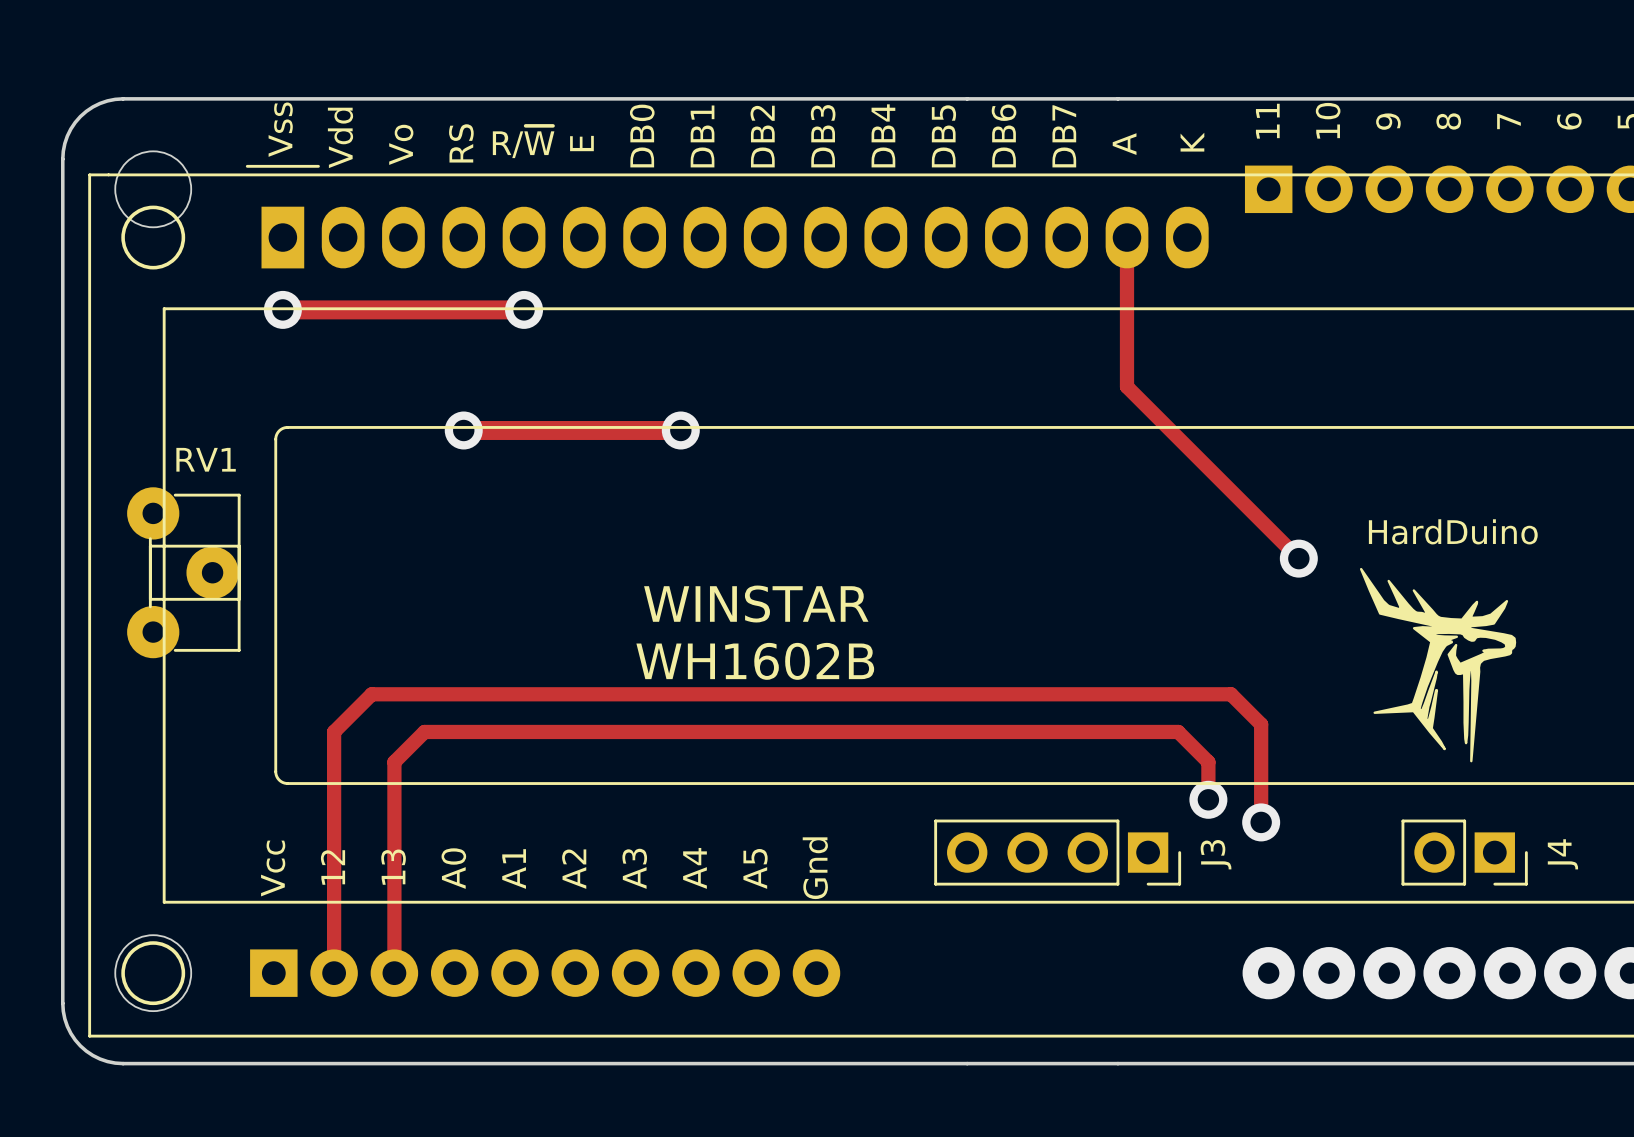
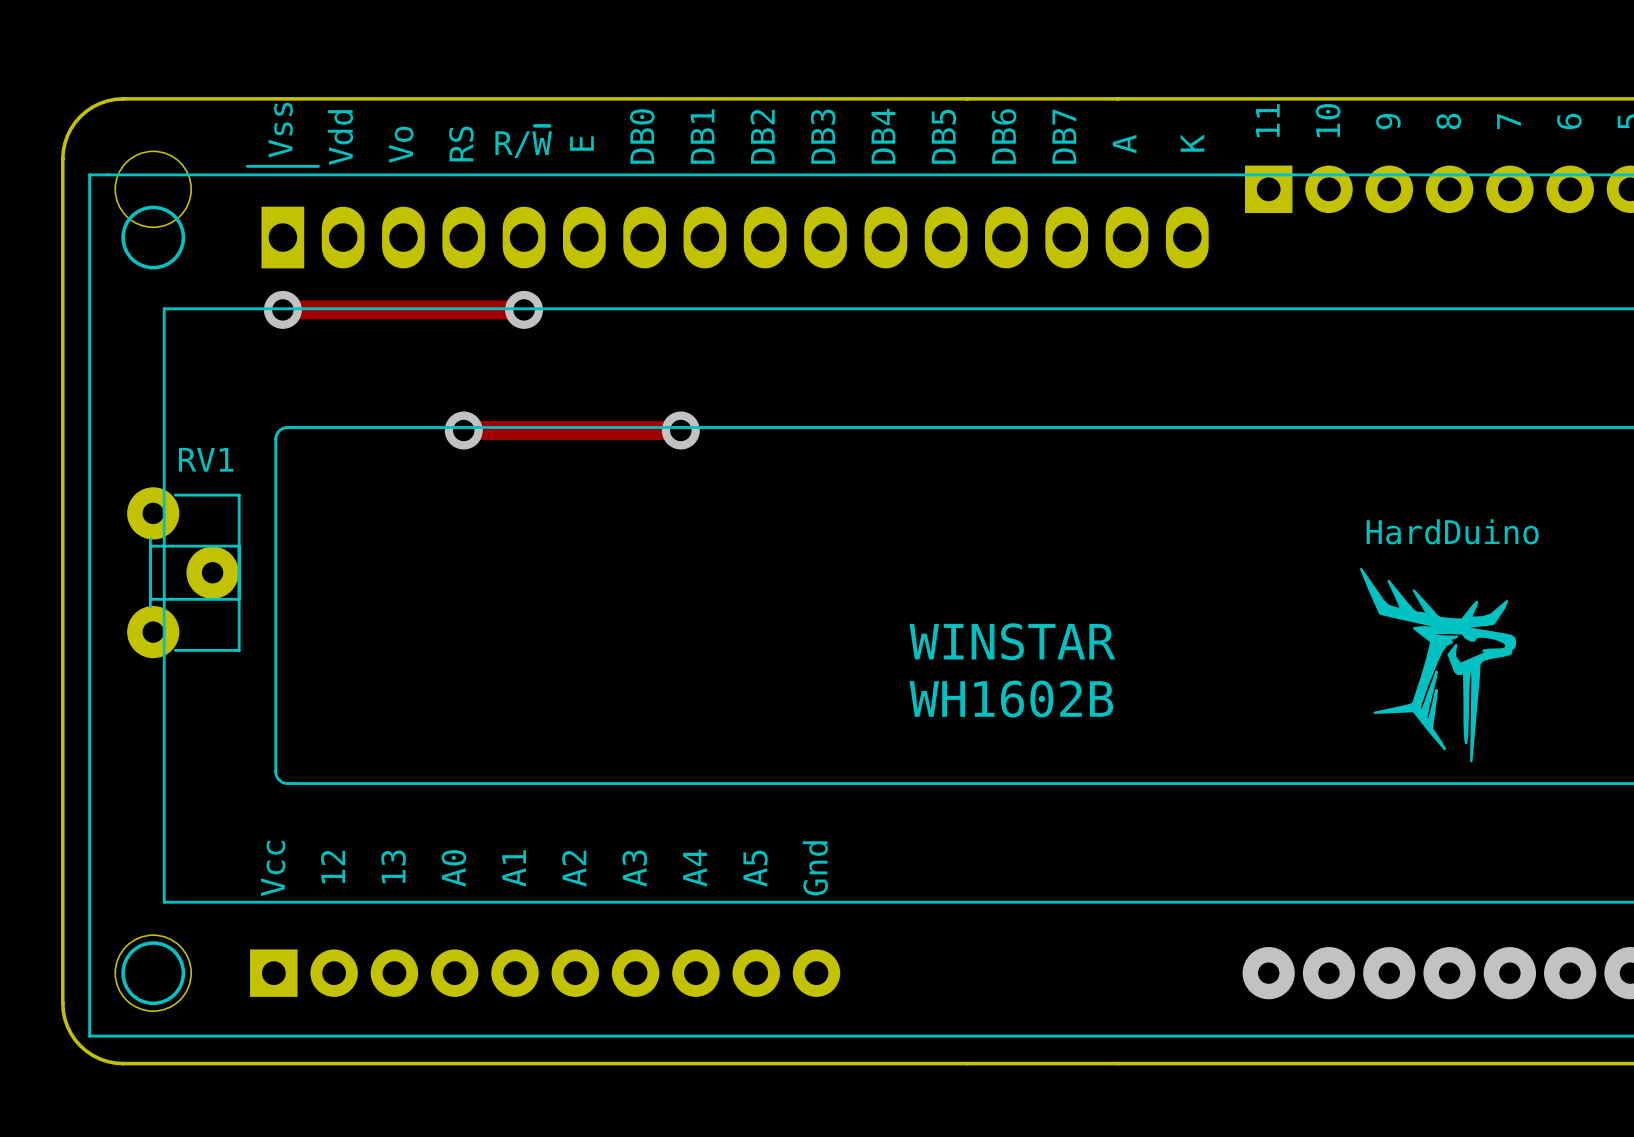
track: (1127, 237) (1127, 386) (1298, 558) -> none
via: (1298, 558) -> none
text position: WINSTAR (756, 604) -> WINSTAR (1012, 641)
text position: WH1602B (755, 661) -> WH1602B (1011, 699)
track: (1208, 799) (1208, 762) (1178, 731) (424, 731) (394, 762) (394, 973) -> none
via: (1208, 799) -> none
track: (1261, 822) (1261, 724) (1231, 694) (371, 694) (334, 731) (334, 973) -> none
via: (1261, 822) -> none
J3: (1057, 852) -> none
J4: (1464, 852) -> none

